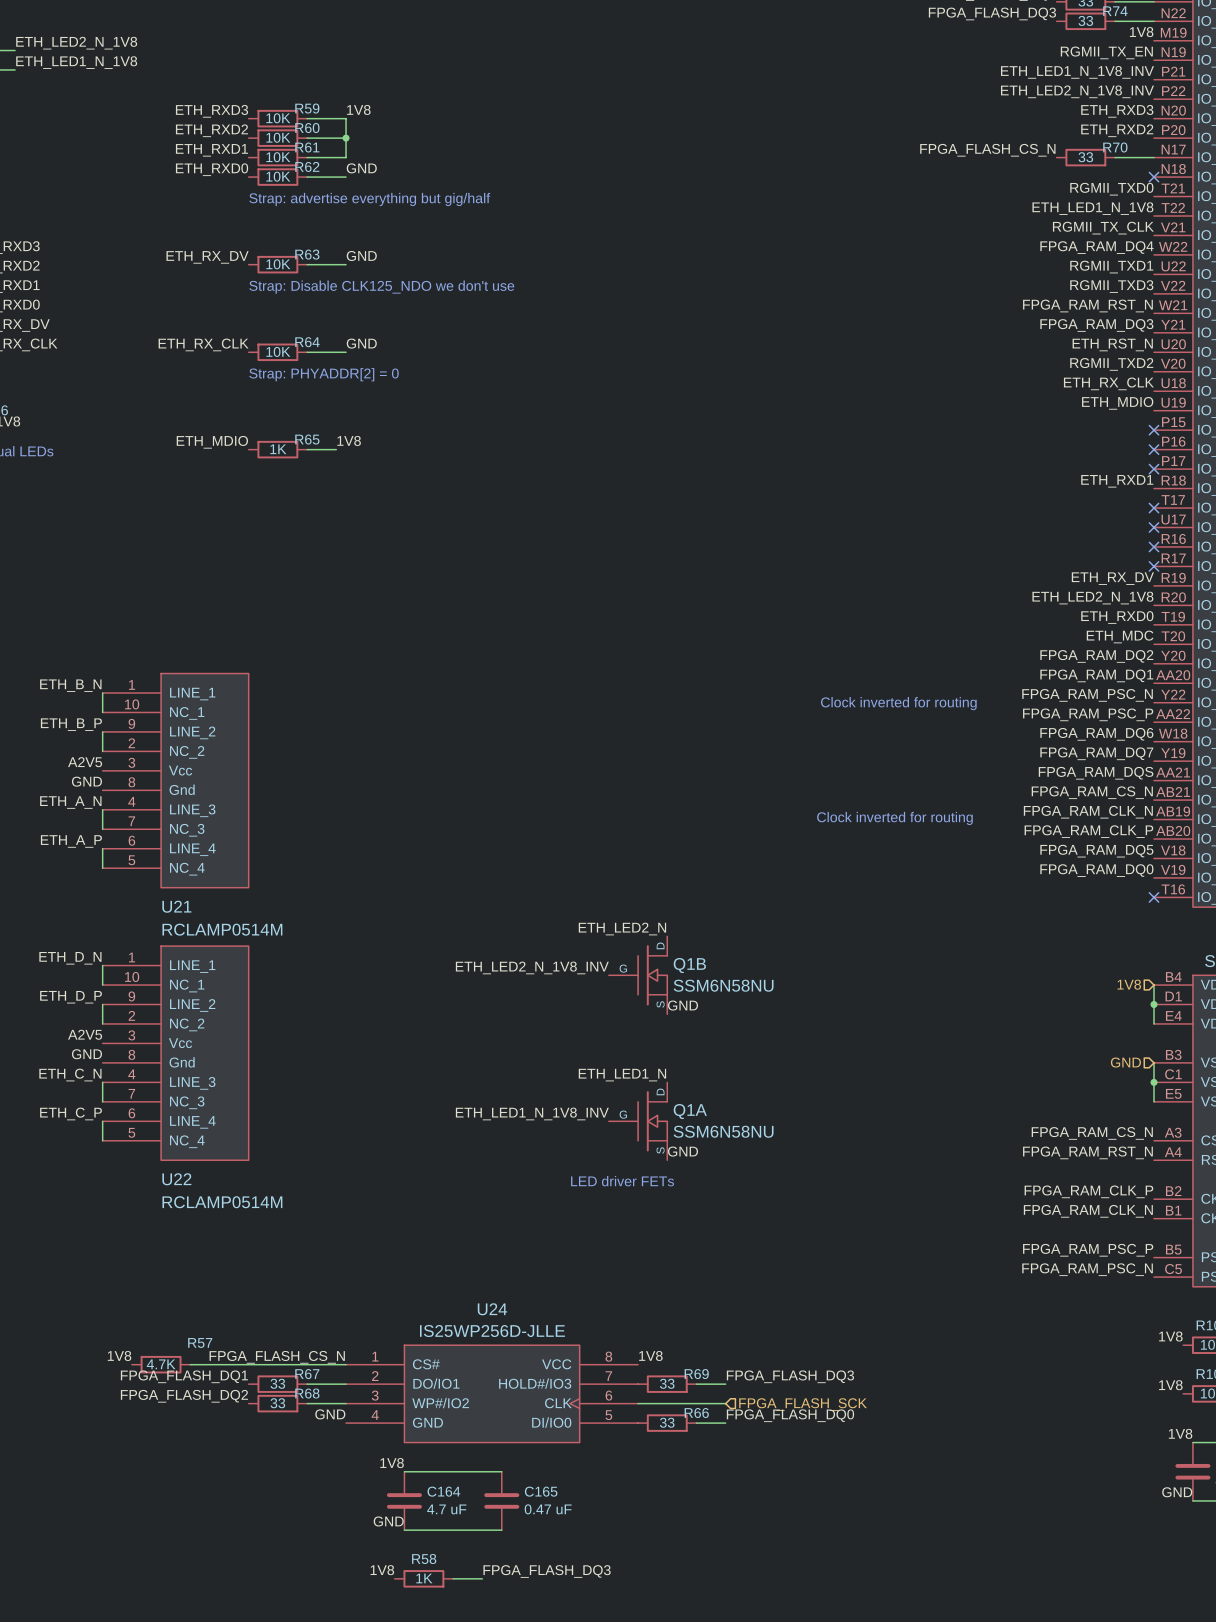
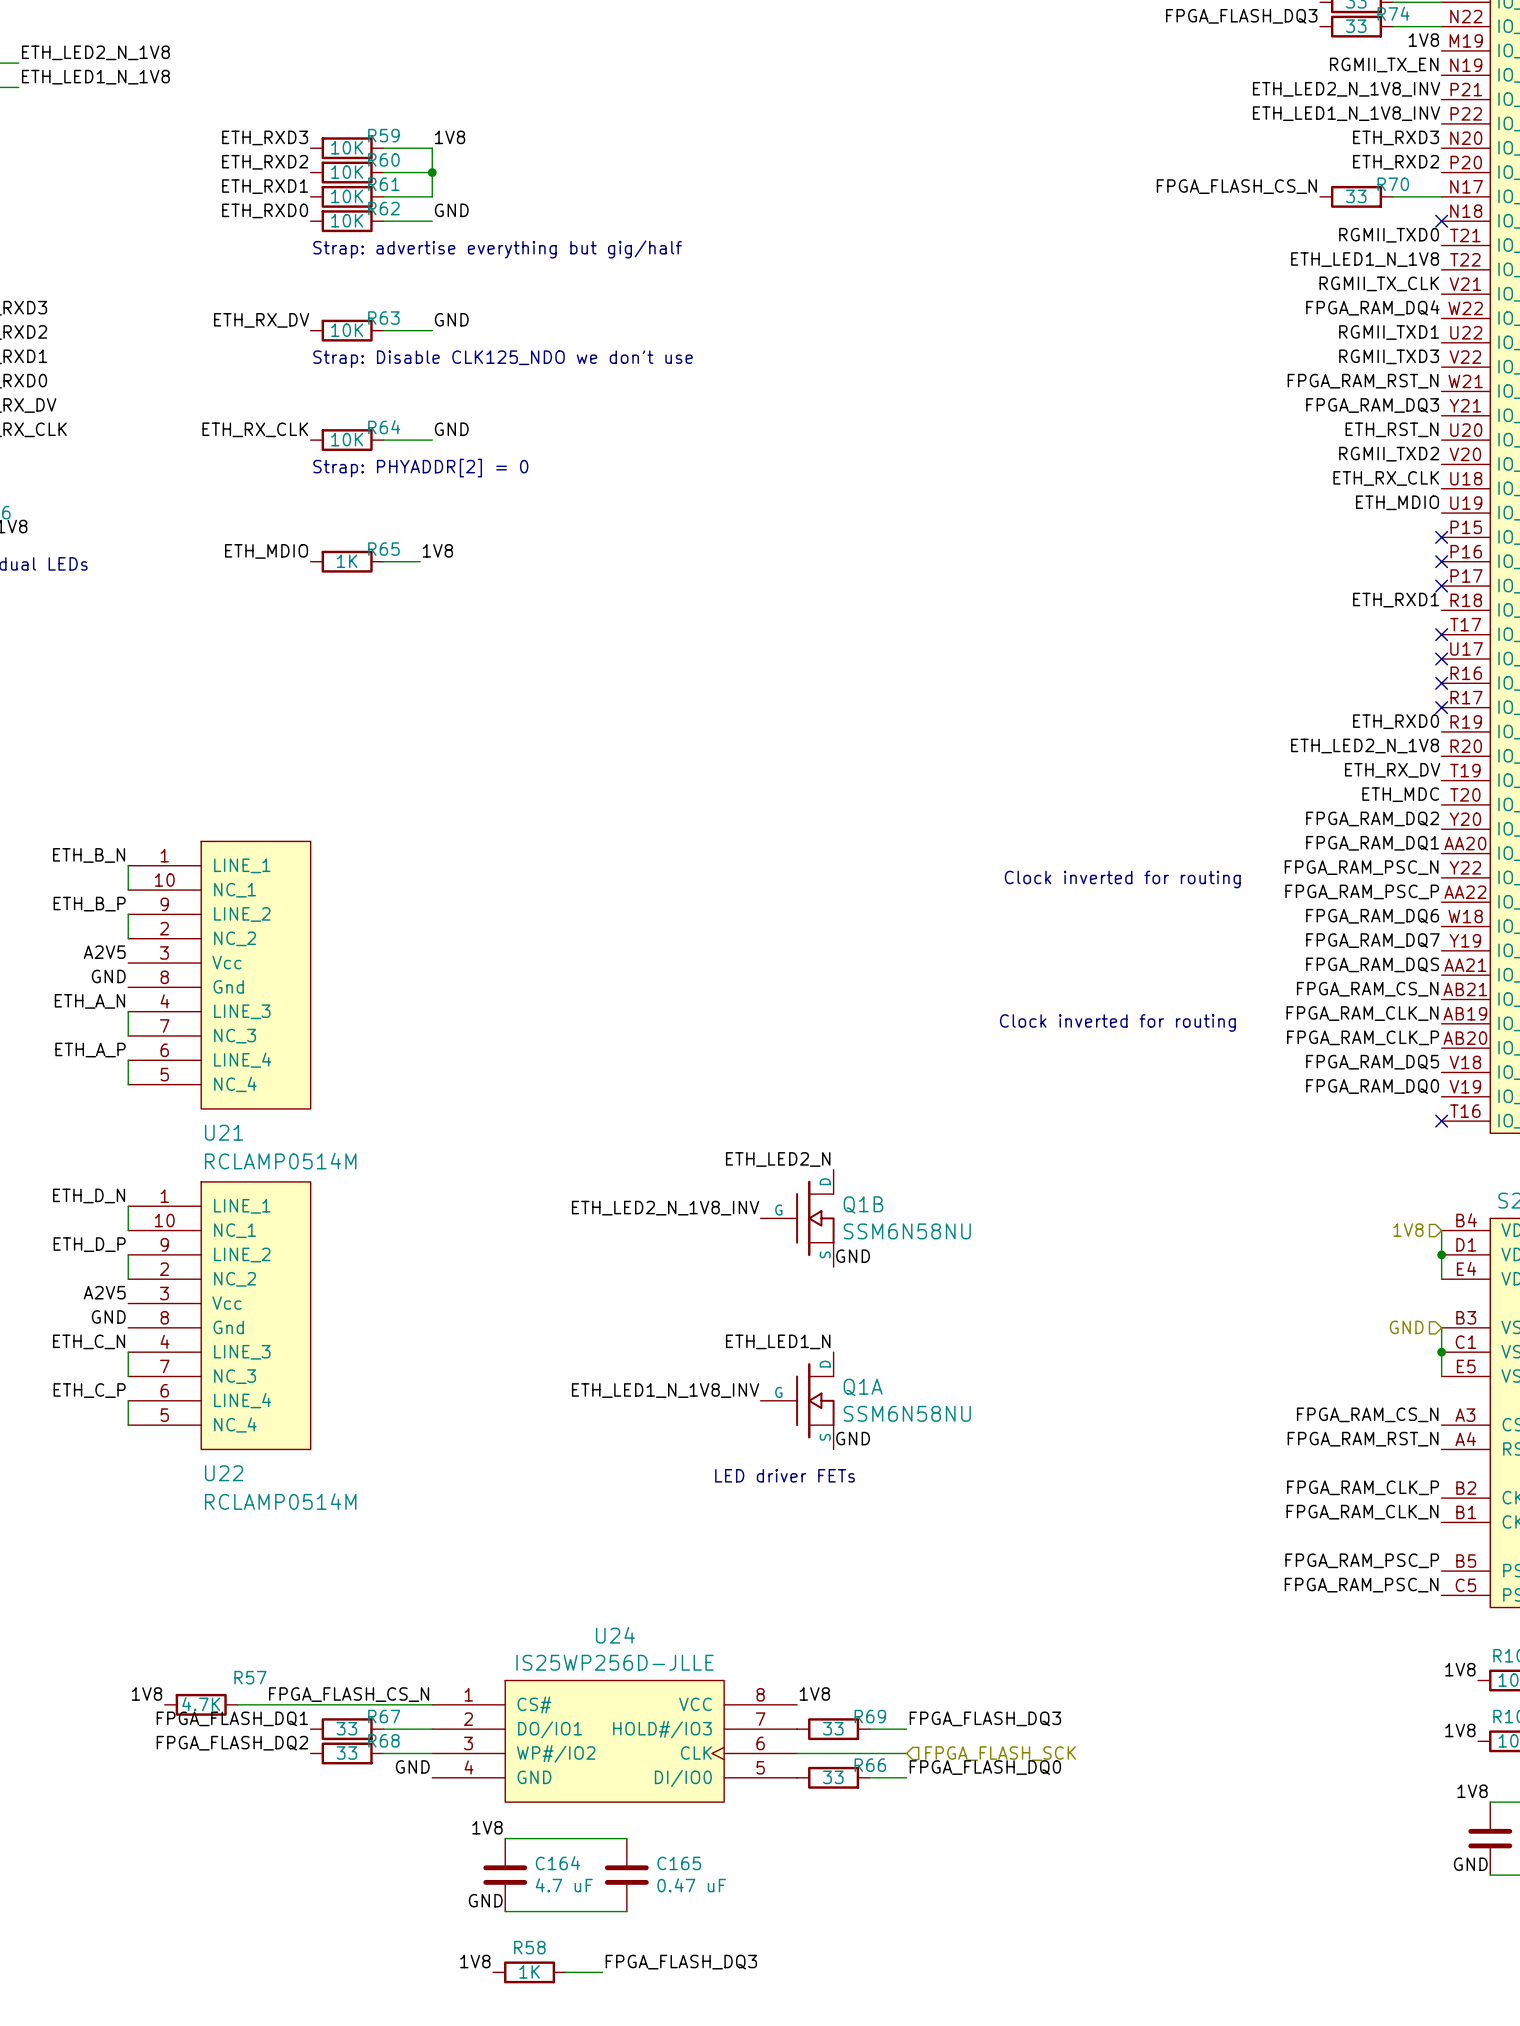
label: ETH_LED1_N_1V8_INV (1077, 72) -> ETH_LED2_N_1V8_INV (1346, 89)
label: ETH_LED2_N_1V8_INV (1077, 91) -> ETH_LED1_N_1V8_INV (1346, 113)
label: ETH_RX_DV (1112, 578) -> ETH_RXD0 (1396, 721)
label: ETH_RXD0 (1117, 617) -> ETH_RX_DV (1392, 770)

